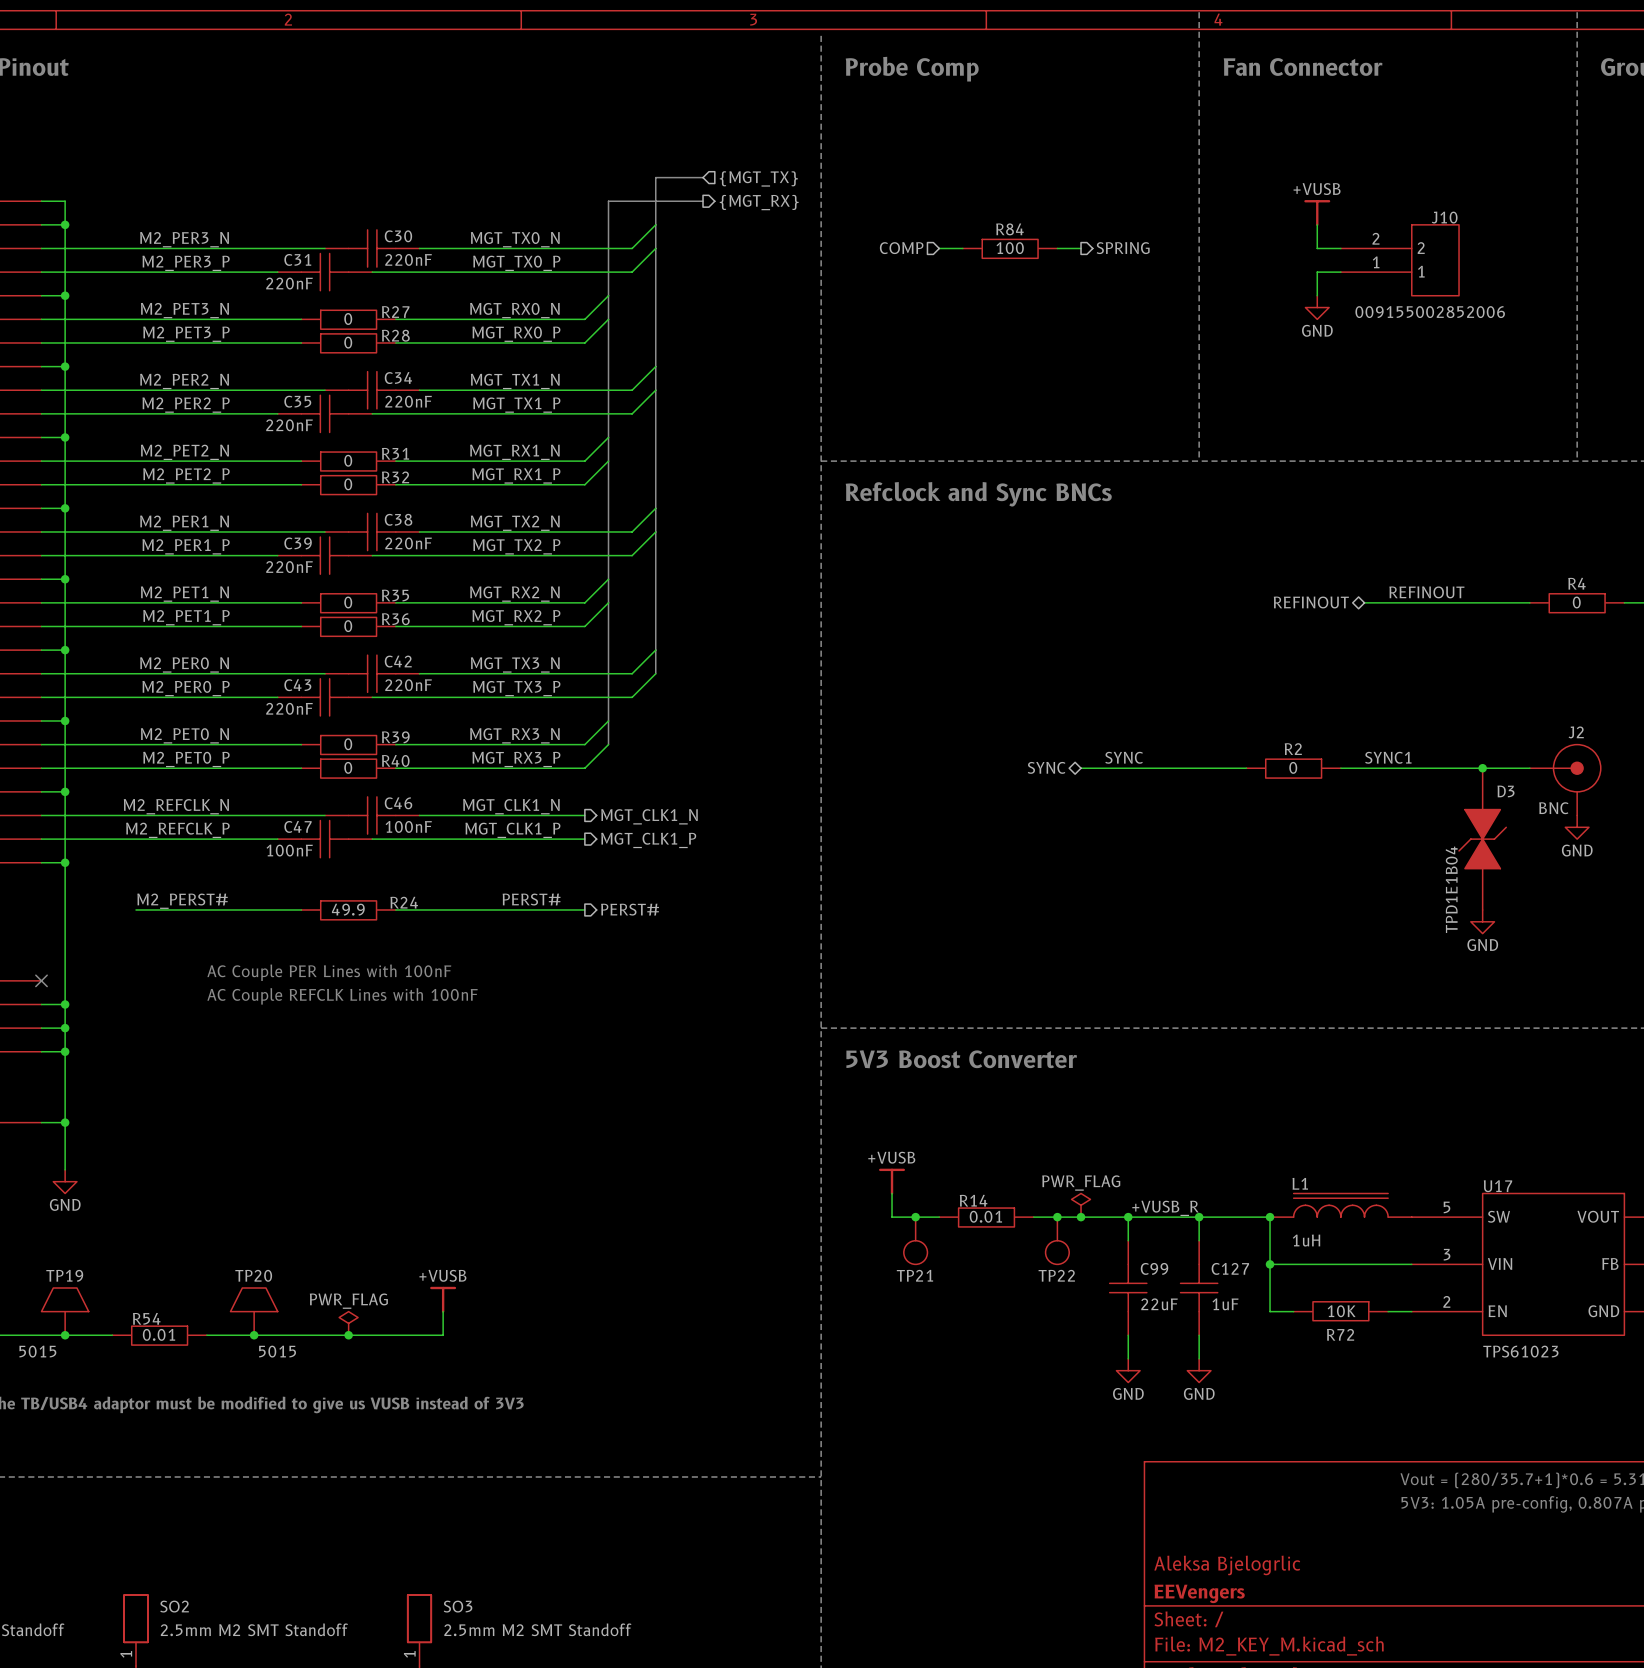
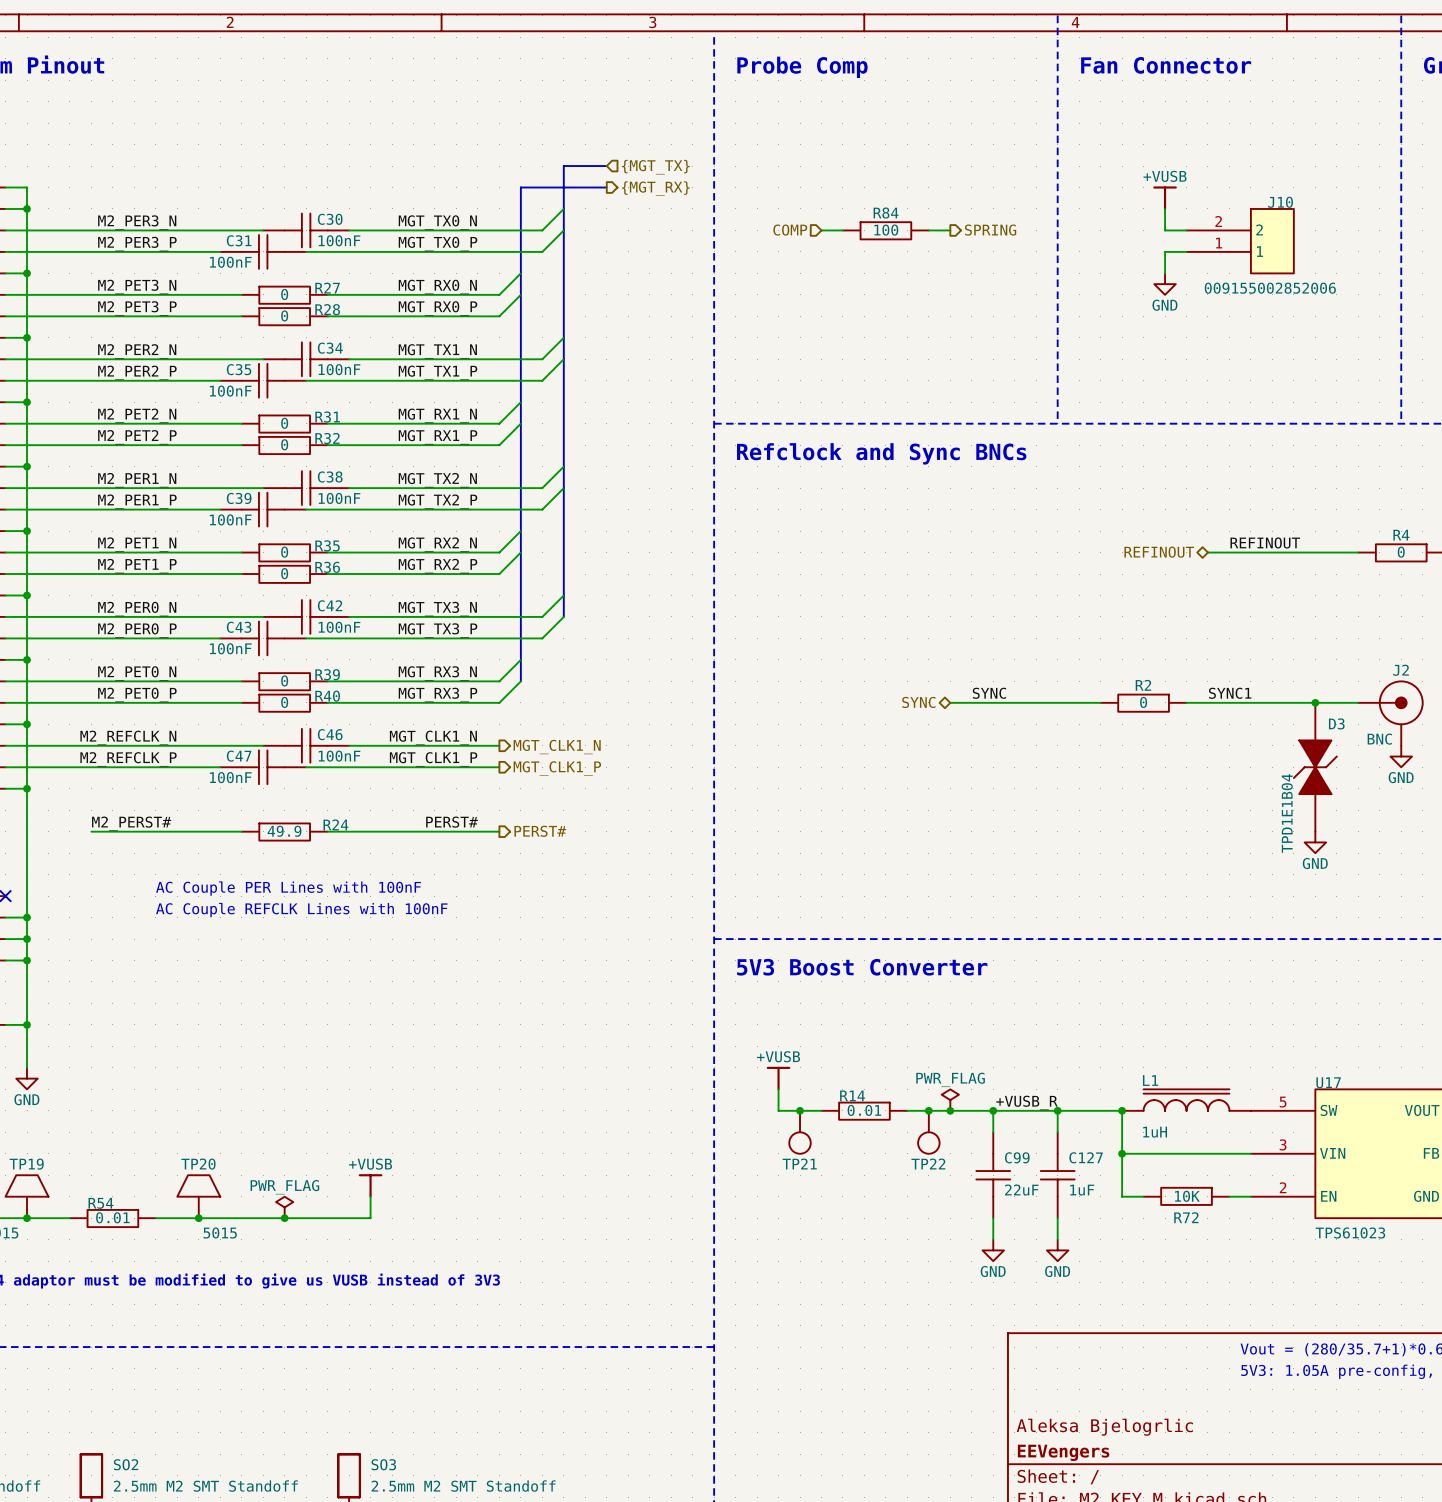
C30 value: 220nF (408, 259) -> 100nF (339, 240)
C31 value: 220nF (289, 283) -> 100nF (230, 262)
C34 value: 220nF (408, 401) -> 100nF (339, 369)
C35 value: 220nF (289, 425) -> 100nF (230, 391)
C38 value: 220nF (408, 543) -> 100nF (339, 498)
C39 value: 220nF (289, 567) -> 100nF (230, 519)
C42 value: 220nF (408, 685) -> 100nF (339, 627)
C43 value: 220nF (289, 708) -> 100nF (230, 648)

